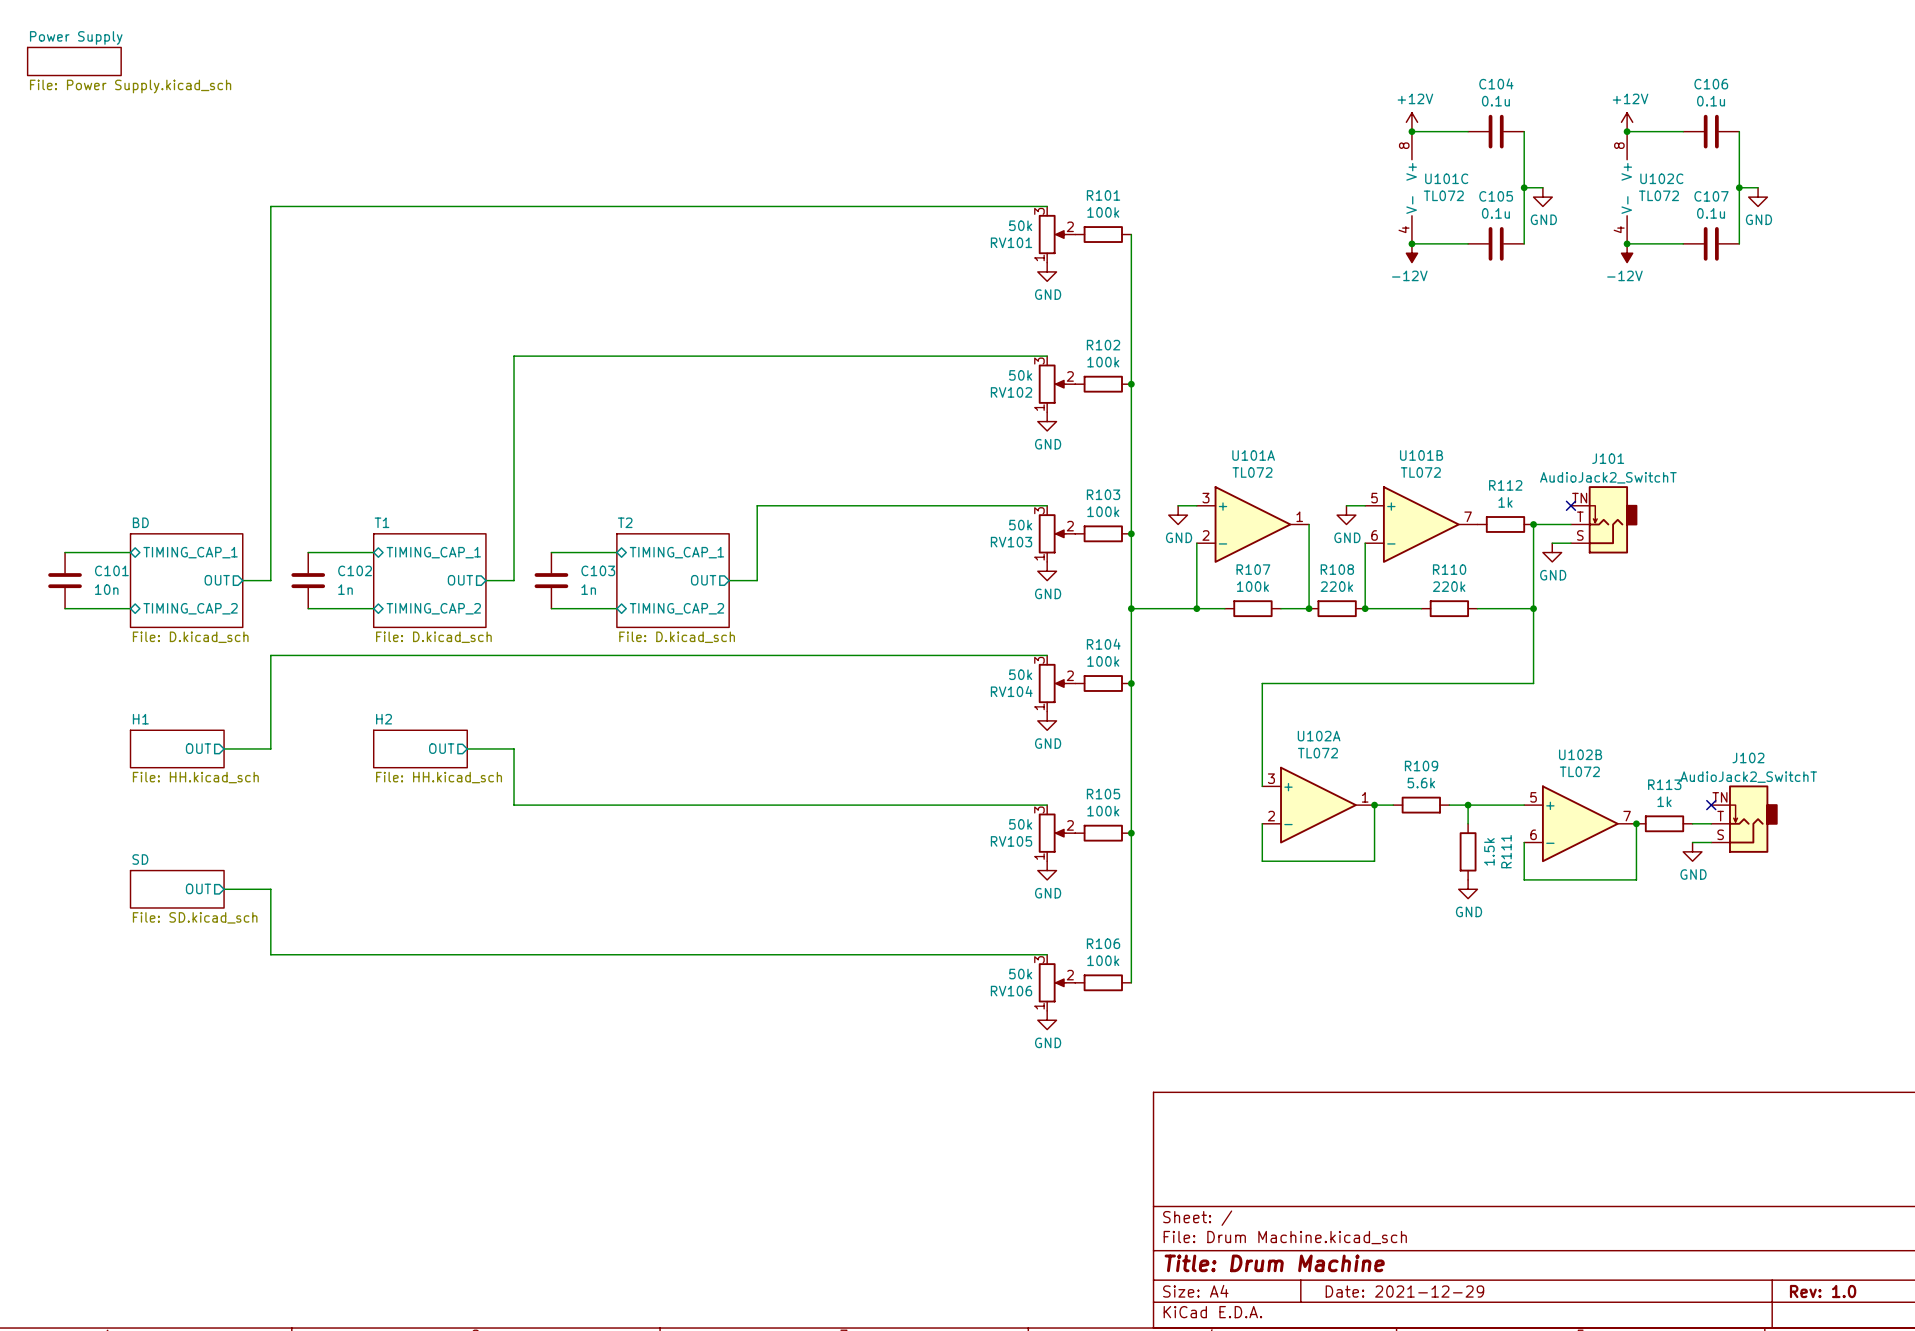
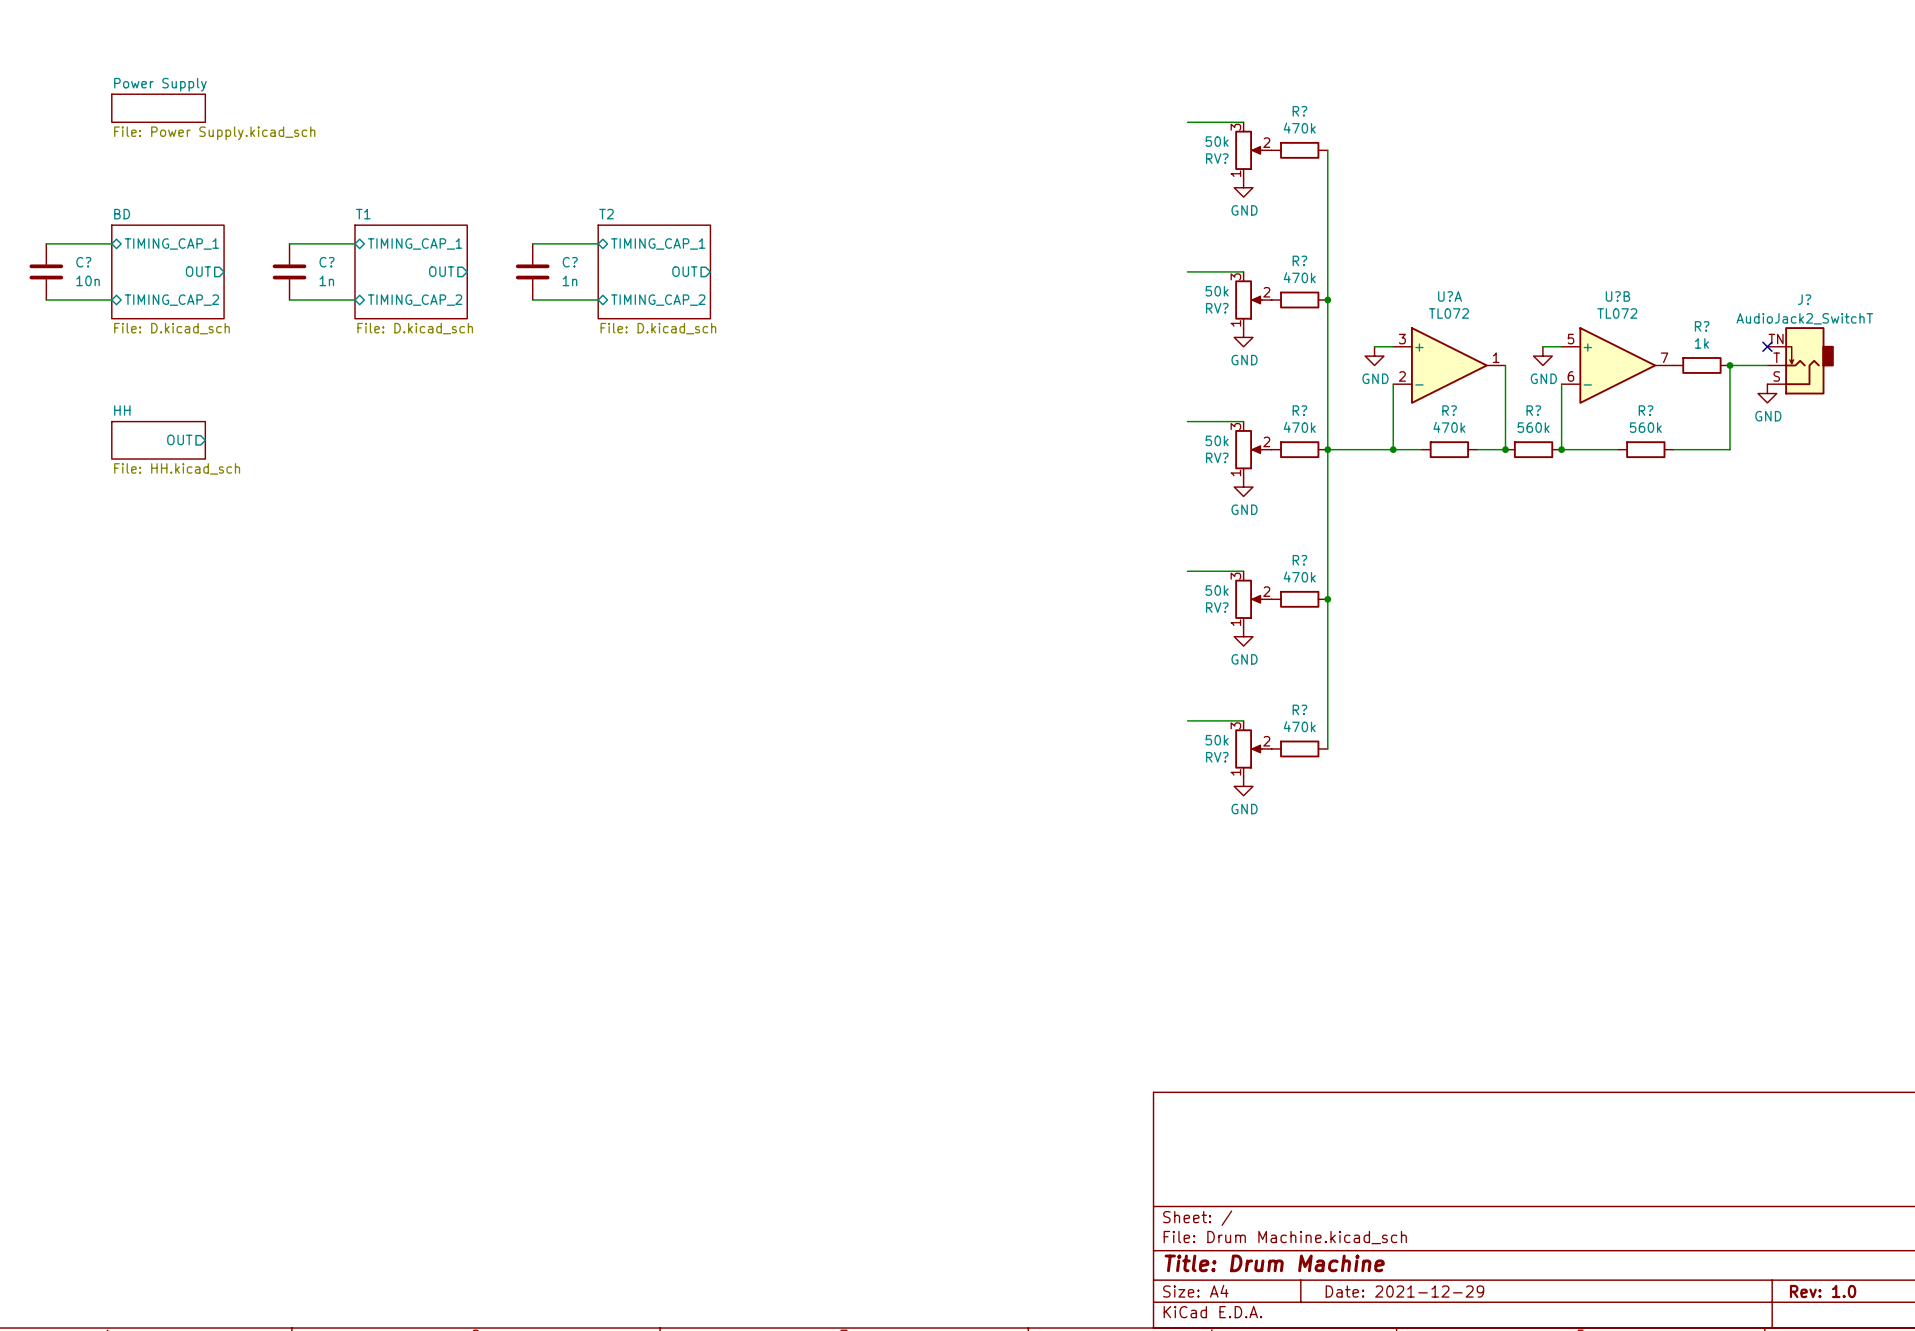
sheet Power Supply position: (74, 61) -> (158, 108)
wire: none -> (1187, 122) (1243, 122)
power symbol: +12V (1411, 122) -> none
power symbol: +12V (1627, 122) -> none
wire: (1411, 131) (1468, 131) -> none
junction: (1411, 131) -> none
C104: 0.1u (1496, 131) -> none
wire: (1524, 131) (1524, 243) -> none
wire: (1627, 131) (1683, 131) -> none
junction: (1627, 131) -> none
C106: 0.1u (1711, 131) -> none
wire: (1739, 131) (1739, 243) -> none
RV?: none -> 50k (1253, 150)
R?: none -> 470k (1299, 150)
wire: none -> (1327, 150) (1327, 748)
power symbol: none -> GND (1243, 187)
U101C: TL072 (1411, 187) -> none
wire: (1524, 187) (1542, 187) -> (1542, 346) (1561, 346)
junction: (1524, 187) -> none
U102C: TL072 (1627, 187) -> none
wire: (1739, 187) (1758, 187) -> none
junction: (1739, 187) -> none
power symbol: GND (1542, 197) -> none
power symbol: GND (1758, 197) -> none
wire: (1047, 206) (270, 206) (270, 580) (242, 580) -> none
RV101: 50k (1056, 234) -> none
R101: 100k (1103, 234) -> none
wire: (1131, 234) (1131, 982) -> none
wire: none -> (46, 243) (111, 243)
sheet pin: none -> TIMING_CAP_1 (171, 243)
wire: none -> (289, 243) (355, 243)
sheet pin: none -> TIMING_CAP_1 (415, 243)
wire: none -> (532, 243) (598, 243)
sheet pin: none -> TIMING_CAP_1 (658, 243)
wire: (1411, 243) (1468, 243) -> none
junction: (1411, 243) -> none
C105: 0.1u (1496, 243) -> none
wire: (1627, 243) (1683, 243) -> none
junction: (1627, 243) -> none
C107: 0.1u (1711, 243) -> none
power symbol: -12V (1411, 253) -> none
power symbol: -12V (1627, 253) -> none
C?: none -> 10n (46, 271)
sheet BD: none -> File: D.kicad_sch (167, 271)
sheet pin: none -> OUT (198, 271)
C?: none -> 1n (289, 271)
sheet pin: none -> OUT (441, 271)
C?: none -> 1n (532, 271)
sheet pin: none -> OUT (684, 271)
power symbol: GND (1047, 271) -> none
wire: none -> (1187, 271) (1243, 271)
wire: none -> (46, 300) (111, 300)
sheet pin: none -> TIMING_CAP_2 (171, 300)
wire: none -> (289, 300) (355, 300)
sheet pin: none -> TIMING_CAP_2 (415, 300)
wire: none -> (532, 300) (598, 300)
sheet pin: none -> TIMING_CAP_2 (658, 300)
RV?: none -> 50k (1253, 300)
R?: none -> 470k (1299, 300)
junction: none -> (1327, 300)
power symbol: none -> GND (1243, 337)
no-connect mark: none -> (1767, 346)
wire: (1047, 356) (514, 356) (514, 580) (485, 580) -> none
power symbol: none -> GND (1374, 356)
power symbol: none -> GND (1542, 356)
J?: none -> AudioJack2_SwitchT (1800, 360)
U?A: none -> TL072 (1449, 365)
wire: none -> (1505, 365) (1505, 449) (1477, 449)
U?B: none -> TL072 (1617, 365)
R?: none -> 1k (1701, 365)
junction: none -> (1729, 365)
wire: none -> (1767, 365) (1729, 365) (1729, 449) (1673, 449)
RV102: 50k (1056, 384) -> none
R102: 100k (1103, 384) -> none
junction: (1131, 384) -> none
wire: none -> (1393, 384) (1393, 449)
wire: none -> (1561, 384) (1561, 449) (1617, 449)
power symbol: none -> GND (1767, 393)
power symbol: GND (1047, 421) -> none
wire: none -> (1187, 421) (1243, 421)
sheet HH: none -> File: HH.kicad_sch (158, 440)
RV?: none -> 50k (1253, 449)
R?: none -> 470k (1299, 449)
wire: none -> (1327, 449) (1421, 449)
junction: none -> (1327, 449)
junction: none -> (1393, 449)
R?: none -> 470k (1449, 449)
junction: none -> (1505, 449)
R?: none -> 560k (1533, 449)
junction: none -> (1561, 449)
R?: none -> 560k (1645, 449)
power symbol: none -> GND (1243, 487)
wire: (1047, 505) (757, 505) (757, 580) (729, 580) -> none
wire: (1178, 505) (1196, 505) -> none
wire: (1346, 505) (1365, 505) -> (1374, 346) (1393, 346)
no-connect mark: (1570, 505) -> none
power symbol: GND (1178, 515) -> none
power symbol: GND (1346, 515) -> none
J101: AudioJack2_SwitchT (1604, 519) -> none
U101A: TL072 (1252, 524) -> none
wire: (1309, 524) (1309, 608) (1281, 608) -> none
U101B: TL072 (1421, 524) -> none
R112: 1k (1505, 524) -> none
junction: (1533, 524) -> none
wire: (1570, 524) (1533, 524) (1533, 683) (1262, 683) (1262, 786) -> none
RV103: 50k (1056, 533) -> none
R103: 100k (1103, 533) -> none
junction: (1131, 533) -> none
wire: (1196, 543) (1196, 608) -> none
wire: (1365, 543) (1365, 608) (1421, 608) -> none
wire: (1552, 543) (1570, 543) -> none
wire: (65, 552) (130, 552) -> none
sheet pin: TIMING_CAP_1 (190, 552) -> none
wire: (308, 552) (373, 552) -> none
sheet pin: TIMING_CAP_1 (433, 552) -> none
wire: (551, 552) (616, 552) -> none
sheet pin: TIMING_CAP_1 (676, 552) -> none
power symbol: GND (1552, 552) -> none
power symbol: GND (1047, 571) -> none
wire: none -> (1187, 571) (1243, 571)
C101: 10n (65, 580) -> none
sheet BD: File: D.kicad_sch (186, 580) -> none
sheet pin position: OUT (217, 580) -> OUT (179, 439)
C102: 1n (308, 580) -> none
sheet T1 position: (429, 580) -> (411, 271)
sheet pin: OUT (460, 580) -> none
C103: 1n (551, 580) -> none
sheet T2 position: (673, 580) -> (654, 271)
sheet pin: OUT (703, 580) -> none
RV?: none -> 50k (1253, 599)
R?: none -> 470k (1299, 599)
junction: none -> (1327, 599)
wire: (65, 608) (130, 608) -> none
sheet pin: TIMING_CAP_2 (190, 608) -> none
wire: (308, 608) (373, 608) -> none
sheet pin: TIMING_CAP_2 (433, 608) -> none
wire: (551, 608) (616, 608) -> none
sheet pin: TIMING_CAP_2 (676, 608) -> none
wire: (1131, 608) (1224, 608) -> none
junction: (1131, 608) -> none
junction: (1196, 608) -> none
R107: 100k (1252, 608) -> none
junction: (1309, 608) -> none
R108: 220k (1337, 608) -> none
junction: (1365, 608) -> none
R110: 220k (1449, 608) -> none
wire: (1477, 608) (1533, 608) -> none
junction: (1533, 608) -> none
power symbol: none -> GND (1243, 636)
wire: (1047, 655) (270, 655) (270, 748) (224, 748) -> none
RV104: 50k (1056, 683) -> none
R104: 100k (1103, 683) -> none
junction: (1131, 683) -> none
power symbol: GND (1047, 720) -> none
wire: none -> (1187, 720) (1243, 720)
sheet H1: File: HH.kicad_sch (177, 748) -> none
sheet pin: OUT (198, 748) -> none
sheet H2: File: HH.kicad_sch (420, 748) -> none
sheet pin: OUT (441, 748) -> none
wire: (467, 748) (514, 748) (514, 805) (1047, 805) -> none
RV?: none -> 50k (1253, 748)
R?: none -> 470k (1299, 748)
power symbol: none -> GND (1243, 786)
U102A: TL072 (1318, 805) -> none
junction: (1374, 805) -> none
wire: (1393, 805) (1374, 805) (1374, 861) (1262, 861) (1262, 823) -> none
R109: 5.6k (1421, 805) -> none
wire: (1449, 805) (1524, 805) -> none
wire: (1468, 805) (1468, 823) -> none
junction: (1468, 805) -> none
no-connect mark: (1711, 805) -> none
J102: AudioJack2_SwitchT (1744, 819) -> none
U102B: TL072 (1580, 823) -> none
wire: (1636, 823) (1636, 879) (1524, 879) (1524, 842) -> none
junction: (1636, 823) -> none
R113: 1k (1664, 823) -> none
wire: (1692, 823) (1711, 823) -> none
RV105: 50k (1056, 833) -> none
R105: 100k (1103, 833) -> none
junction: (1131, 833) -> none
wire: (1692, 842) (1711, 842) -> none
R111: 1.5k (1468, 851) -> none
power symbol: GND (1692, 851) -> none
power symbol: GND (1047, 870) -> none
sheet pin: OUT (198, 888) -> none
sheet SD: File: SD.kicad_sch (177, 889) -> none
wire: (224, 889) (270, 889) (270, 954) (1047, 954) -> none
power symbol: GND (1468, 889) -> none
RV106: 50k (1056, 982) -> none
R106: 100k (1103, 982) -> none
power symbol: GND (1047, 1020) -> none

